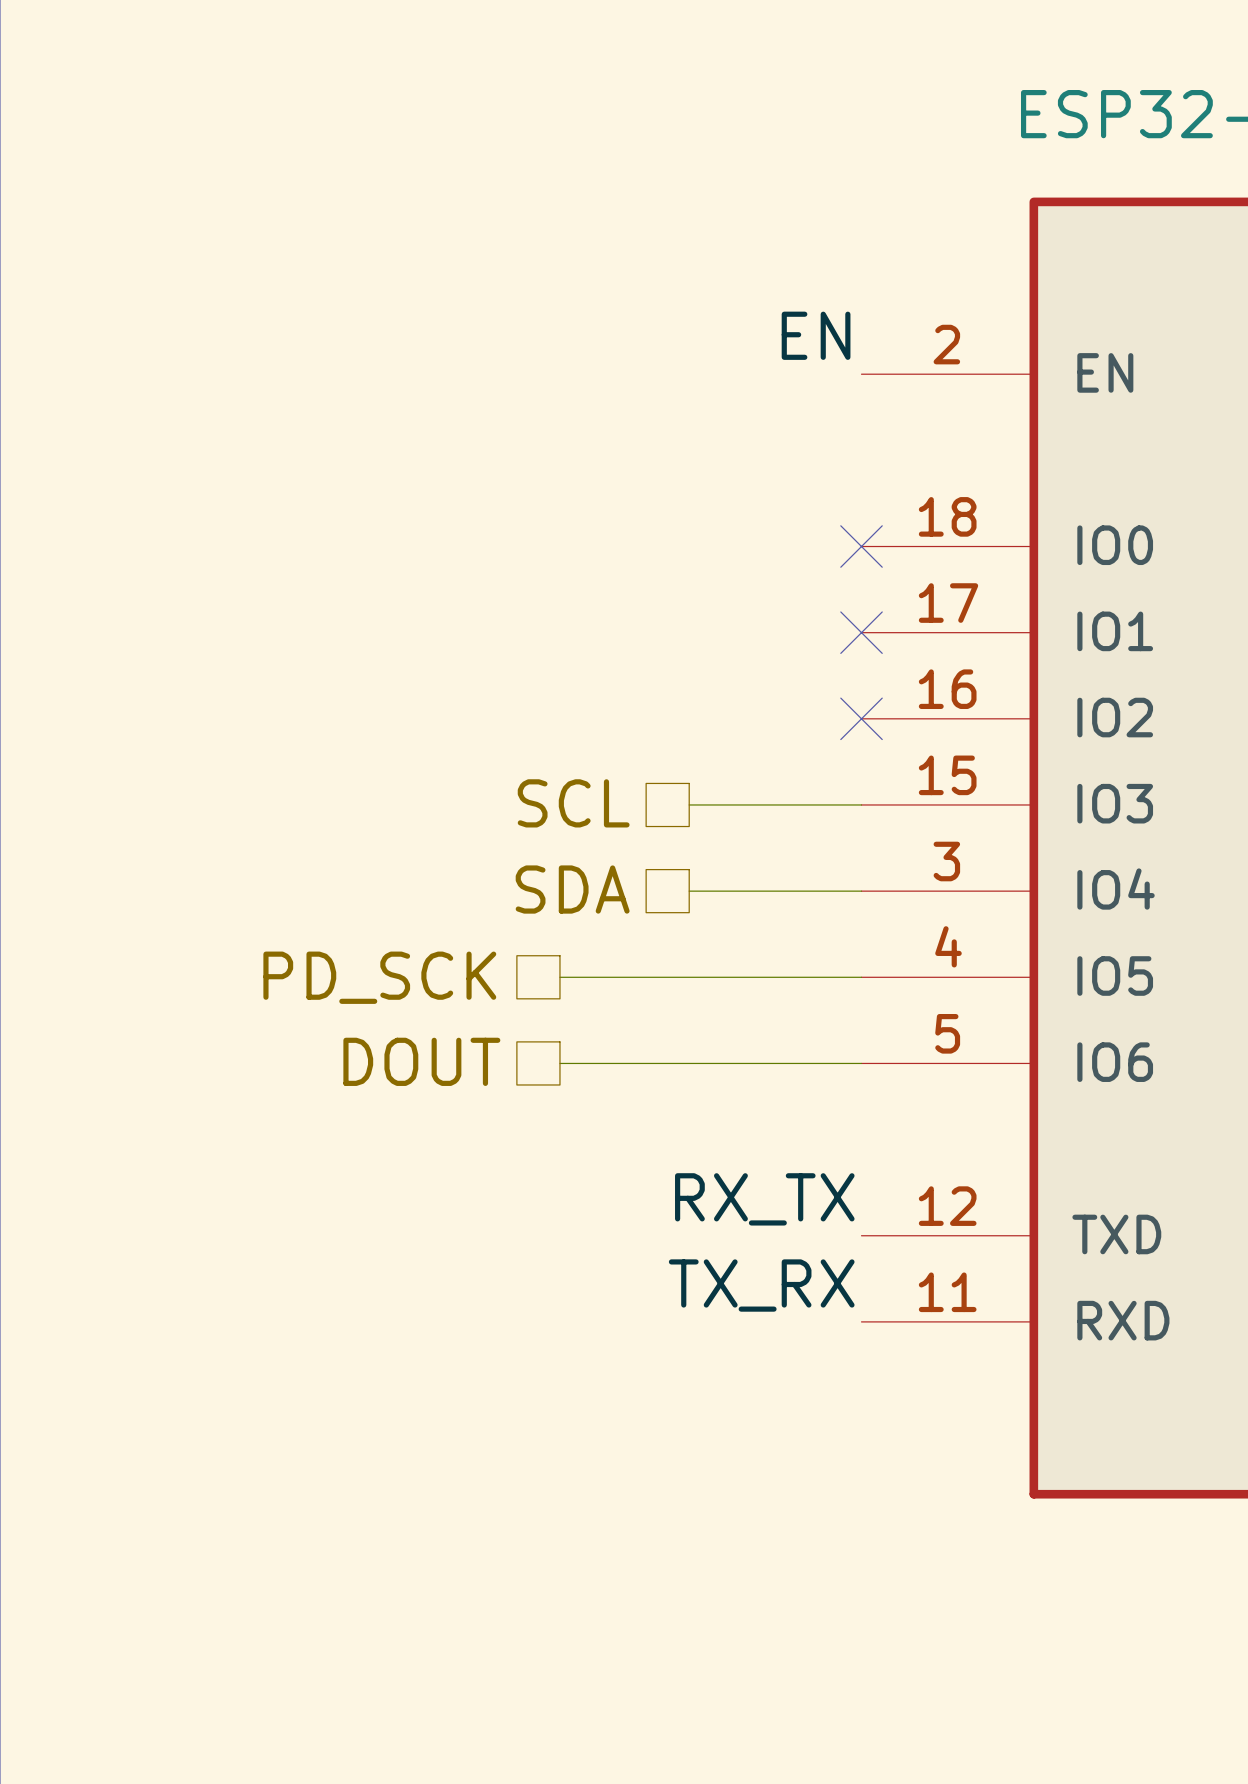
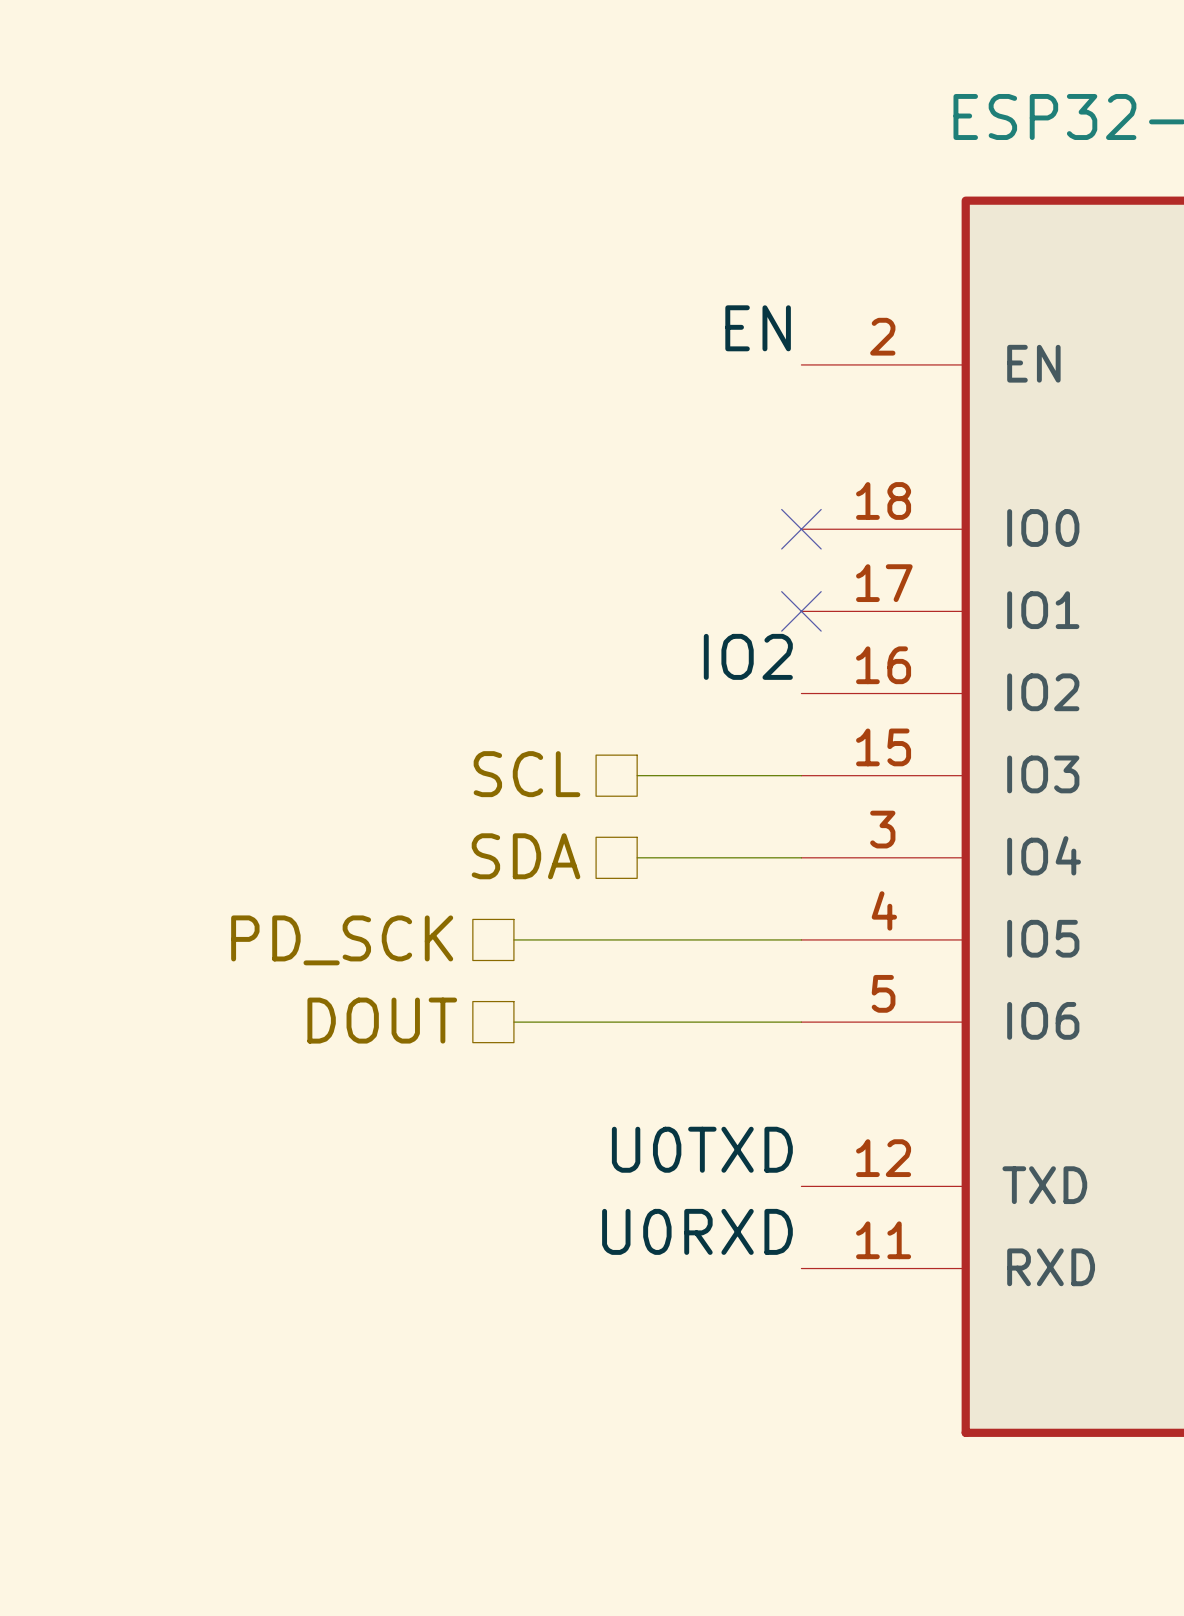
label: none -> IO2 (748, 656)
no-connect mark: (861, 718) -> none
label: RX_TX (764, 1199) -> U0TXD (702, 1149)
label: TX_RX (761, 1285) -> U0RXD (697, 1231)

